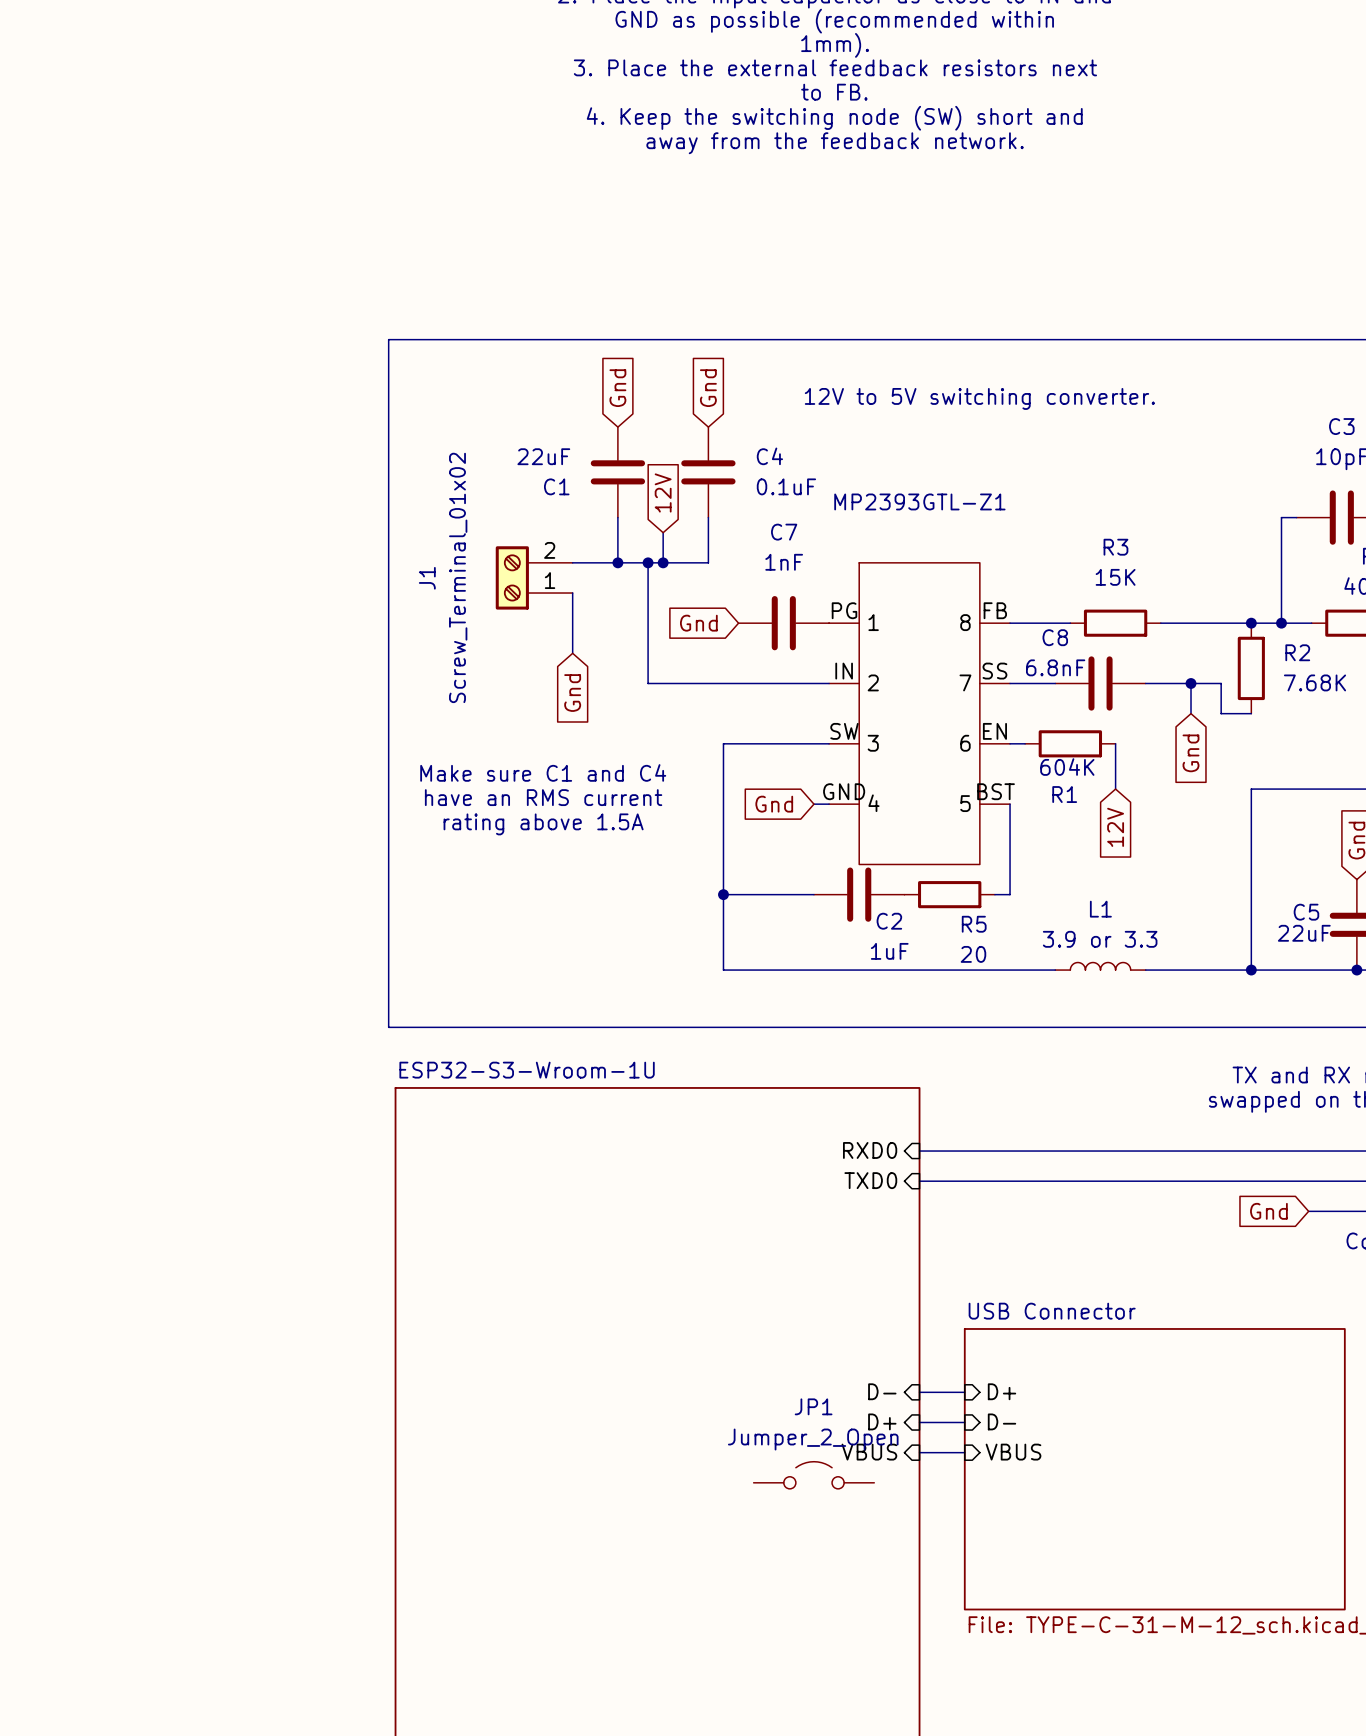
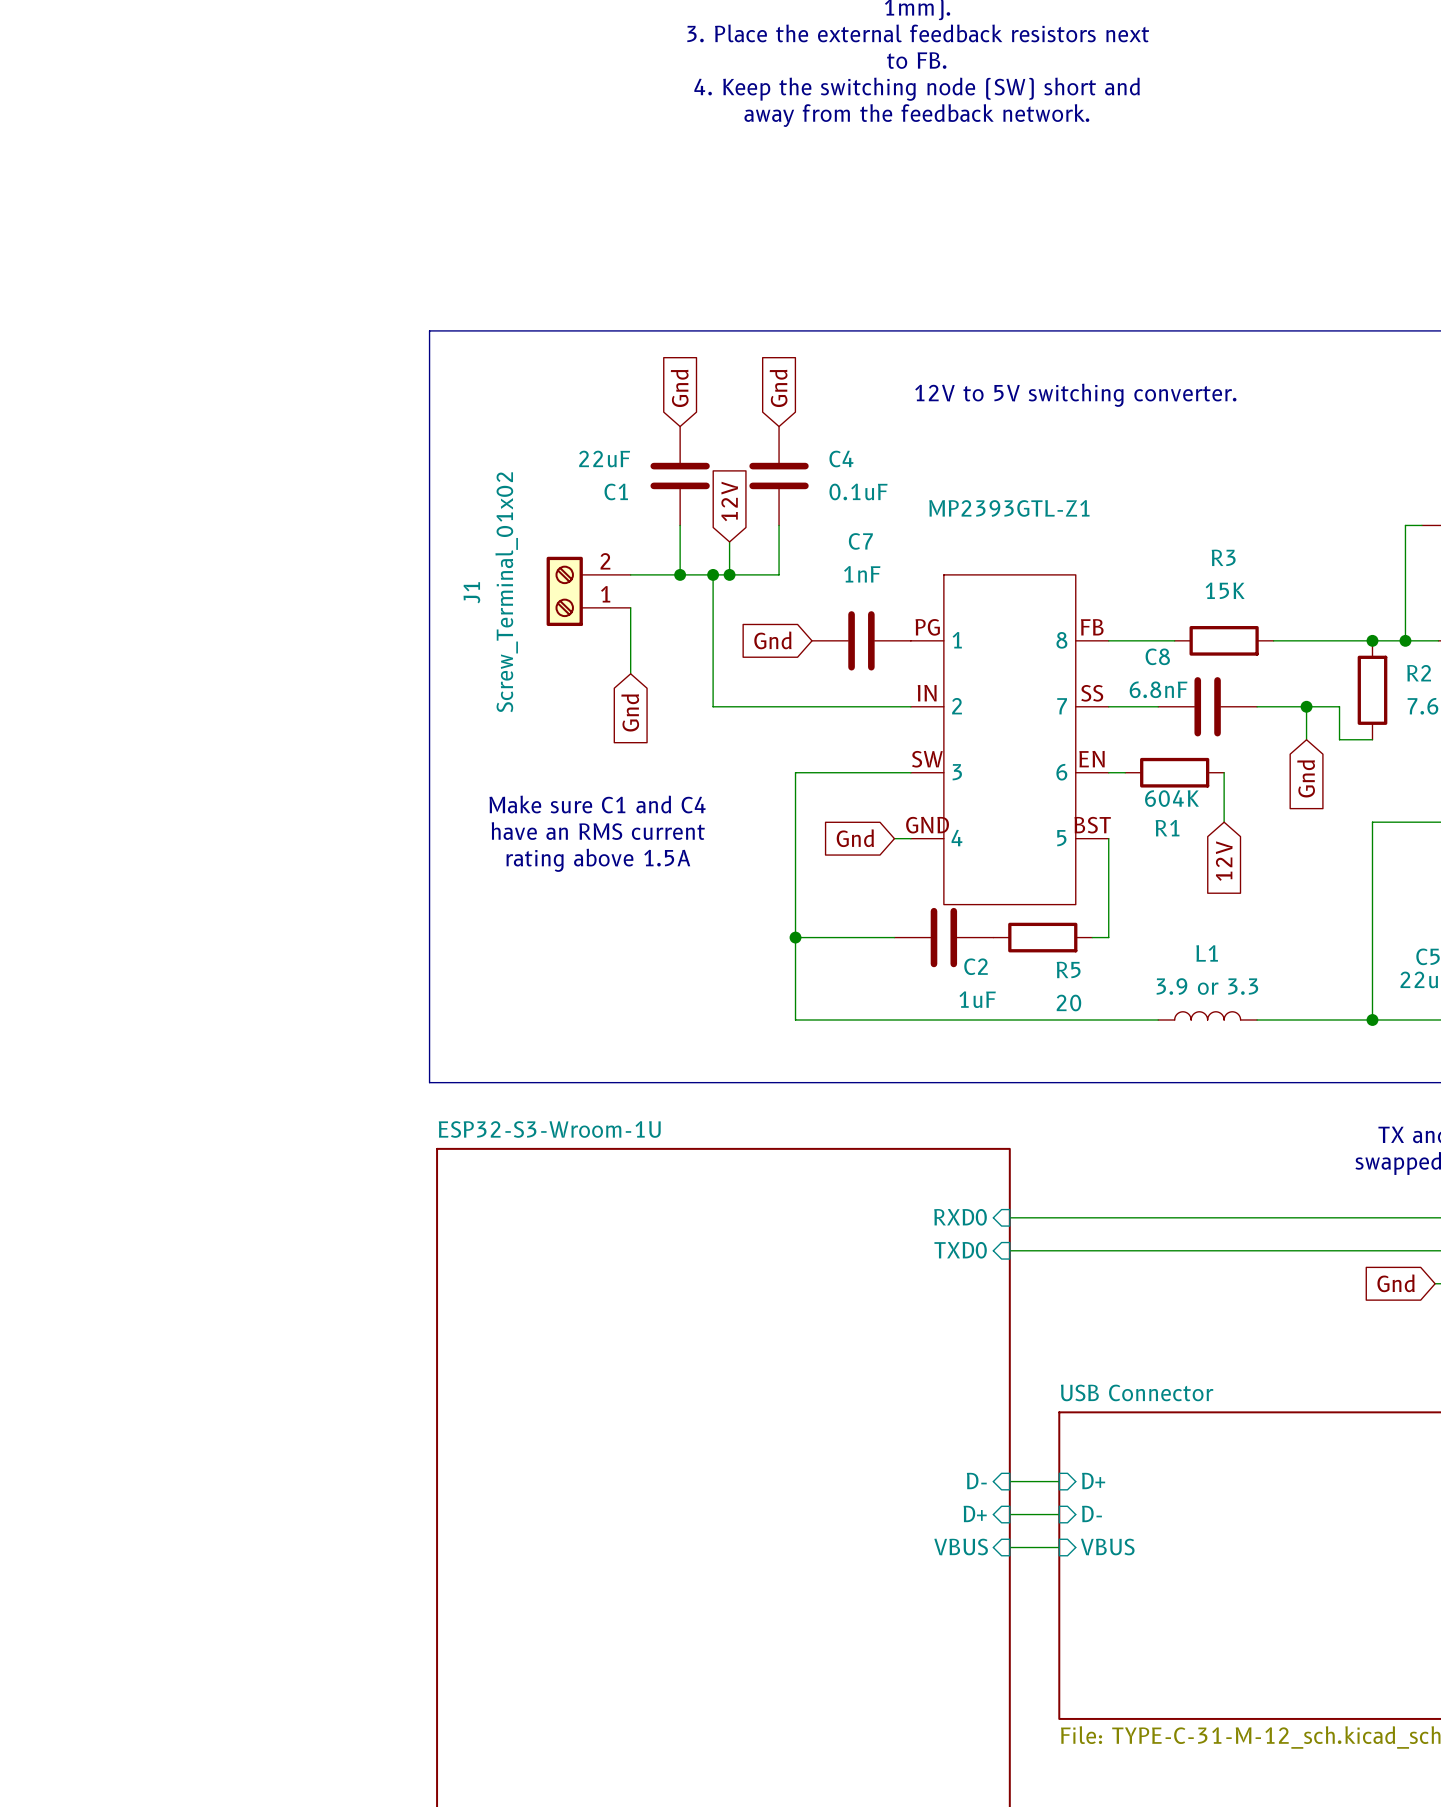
JP1: Jumper_2_Open (813, 1475) -> none

